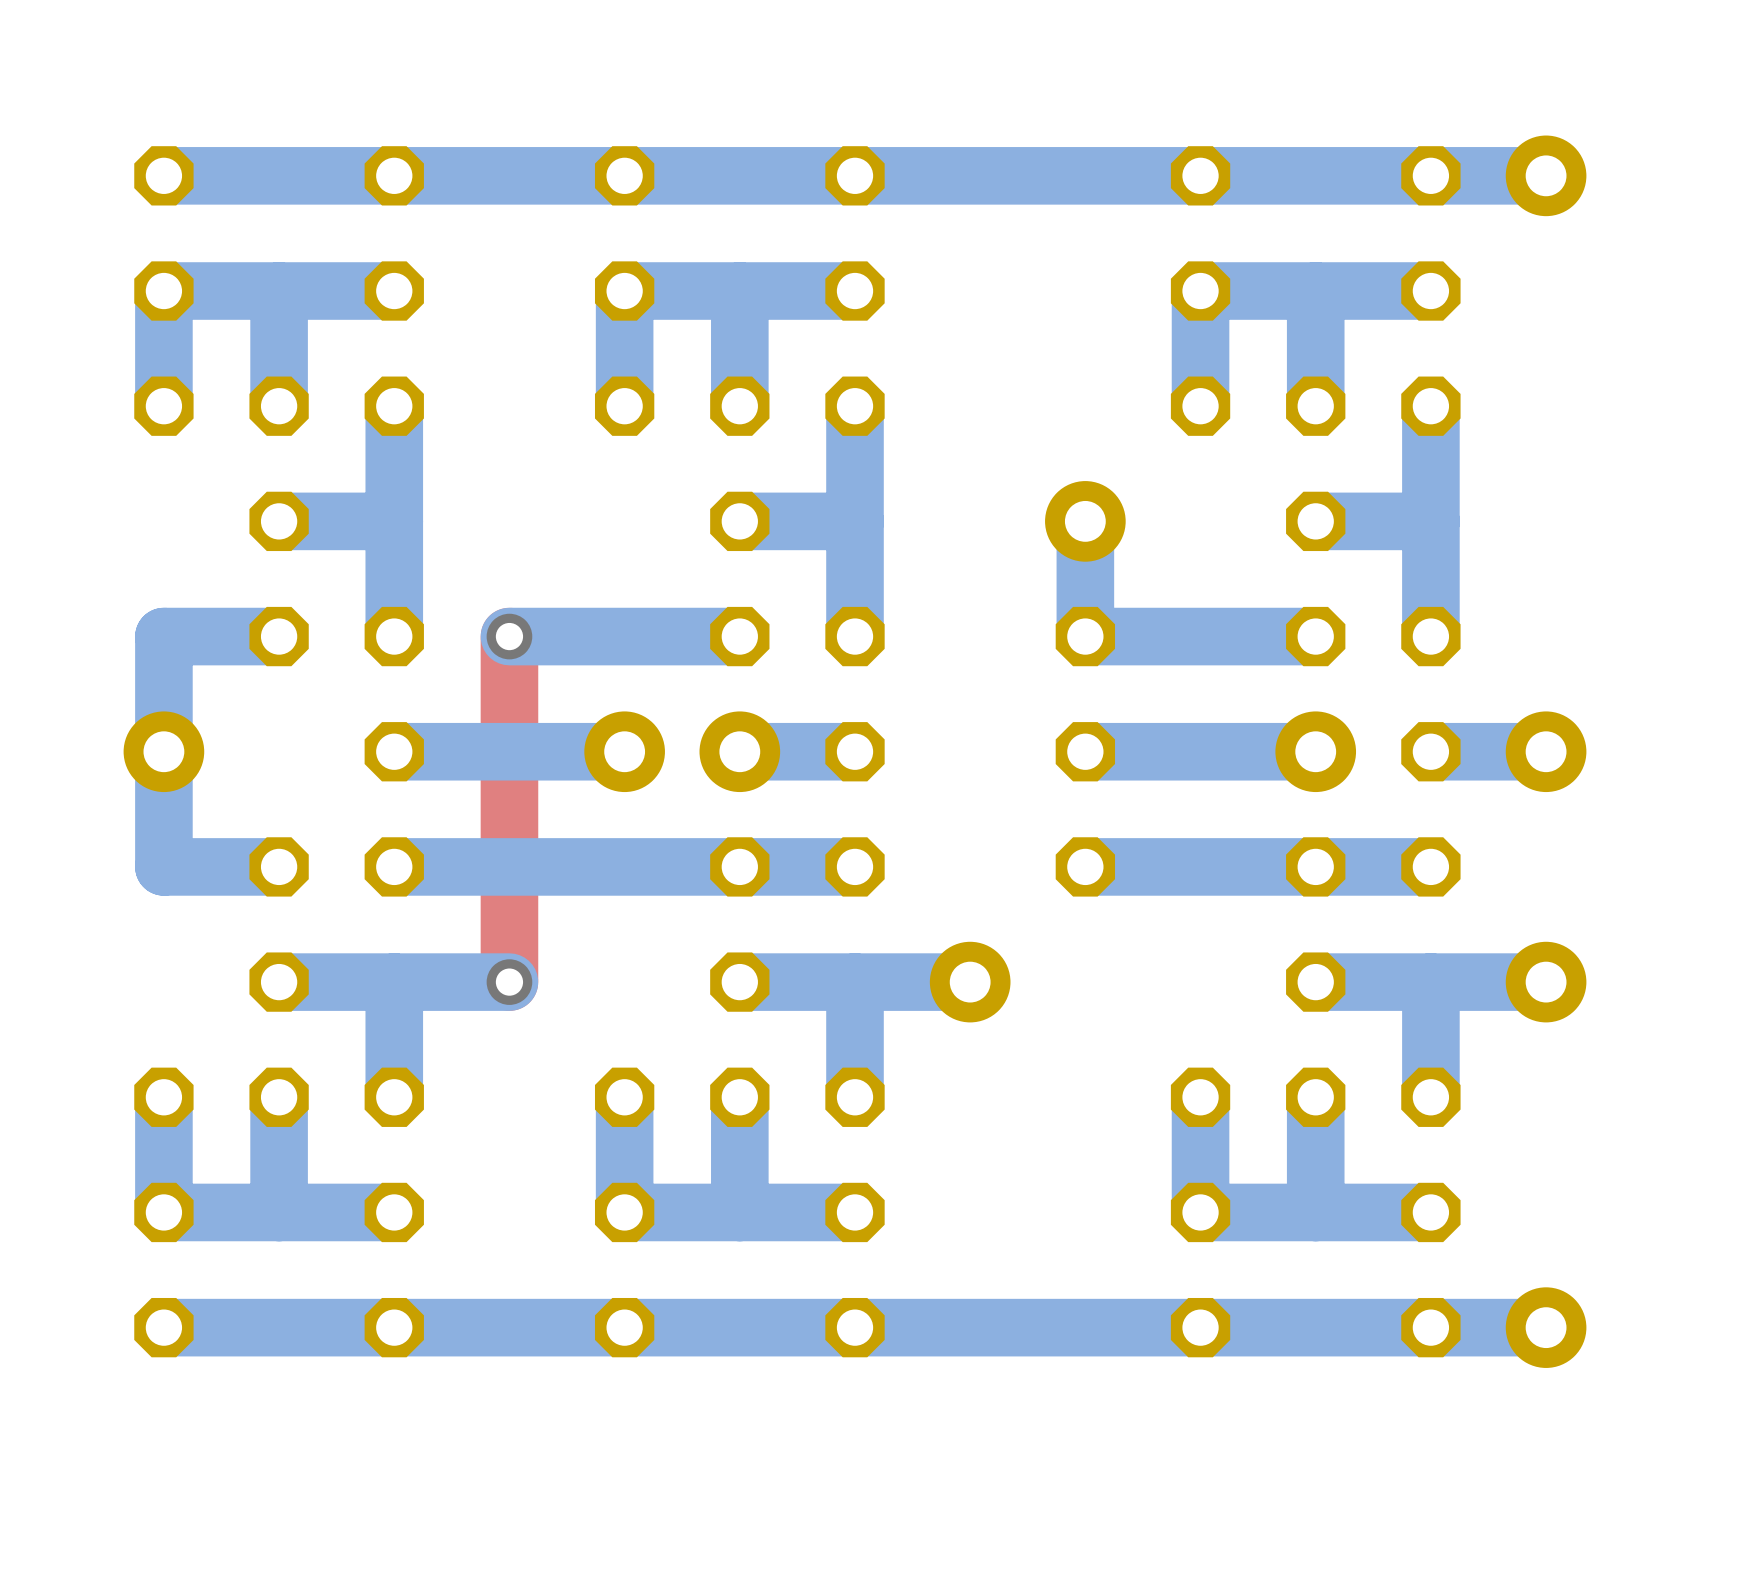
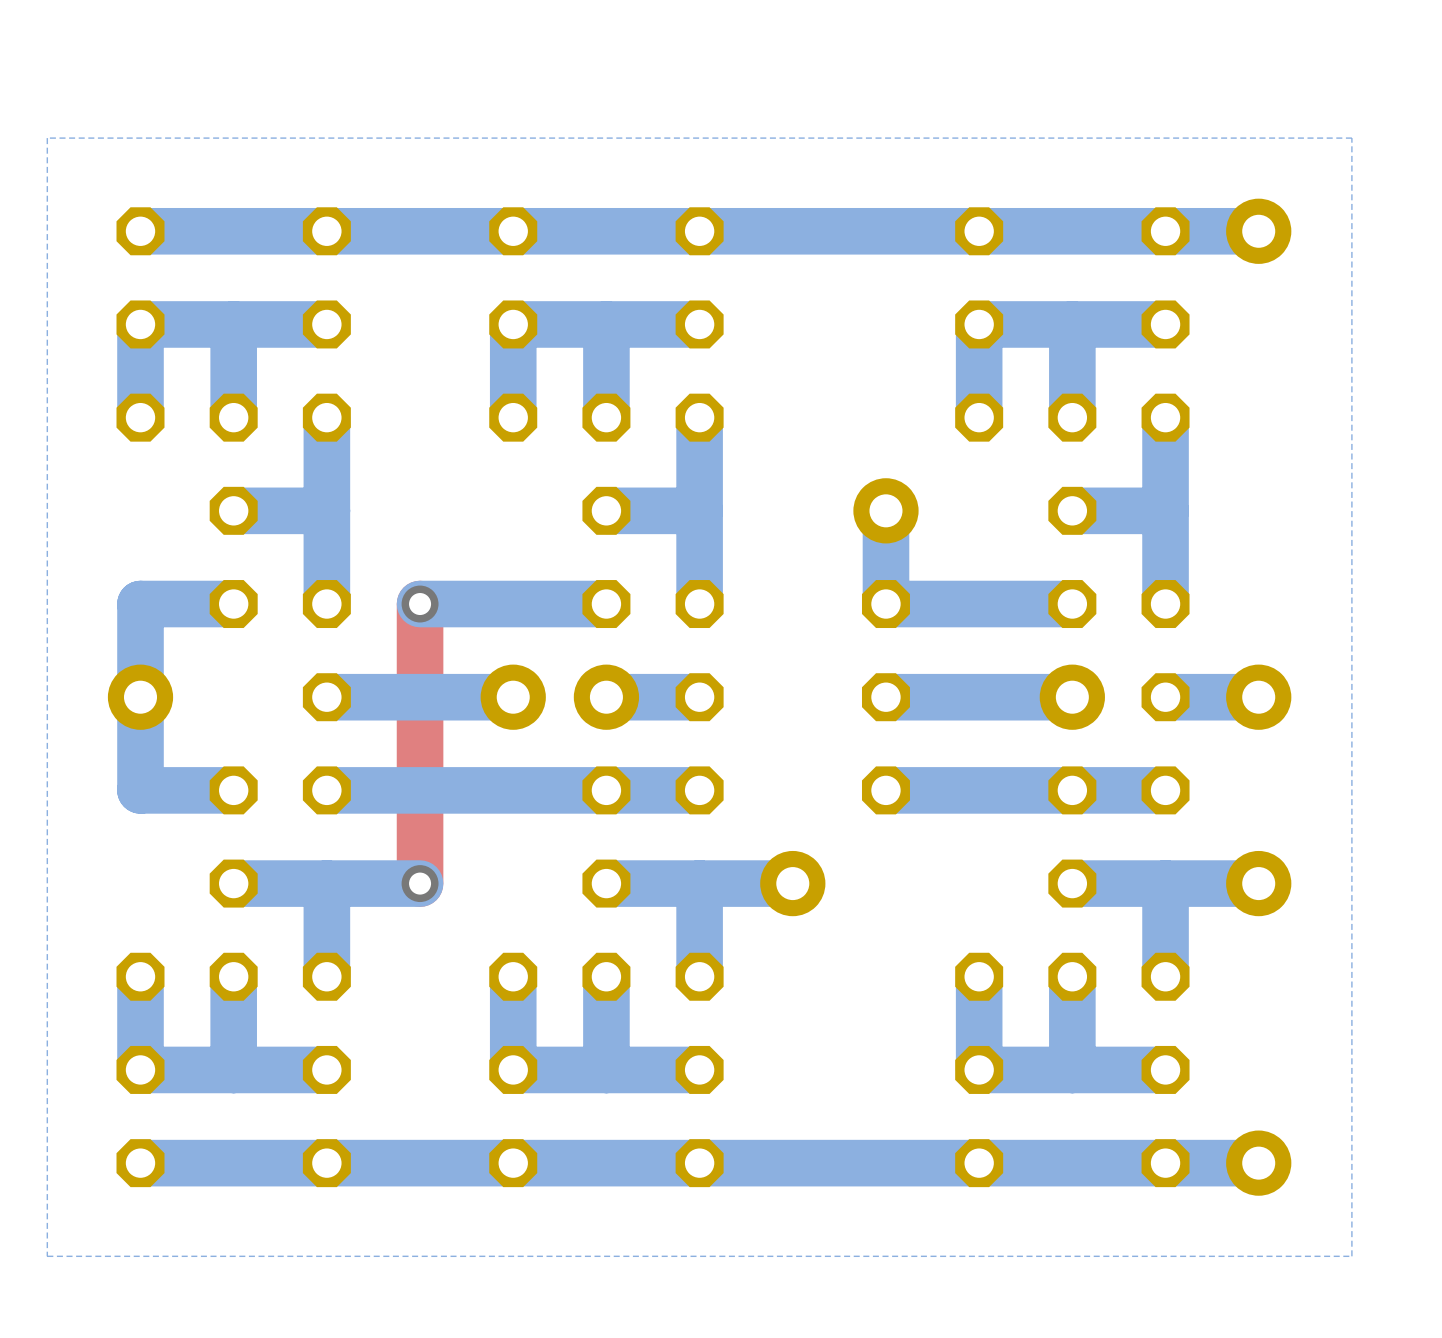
bottom zone outline: none -> (1351, 138) (1351, 1256) (47, 1256) (47, 138) (1351, 138)

